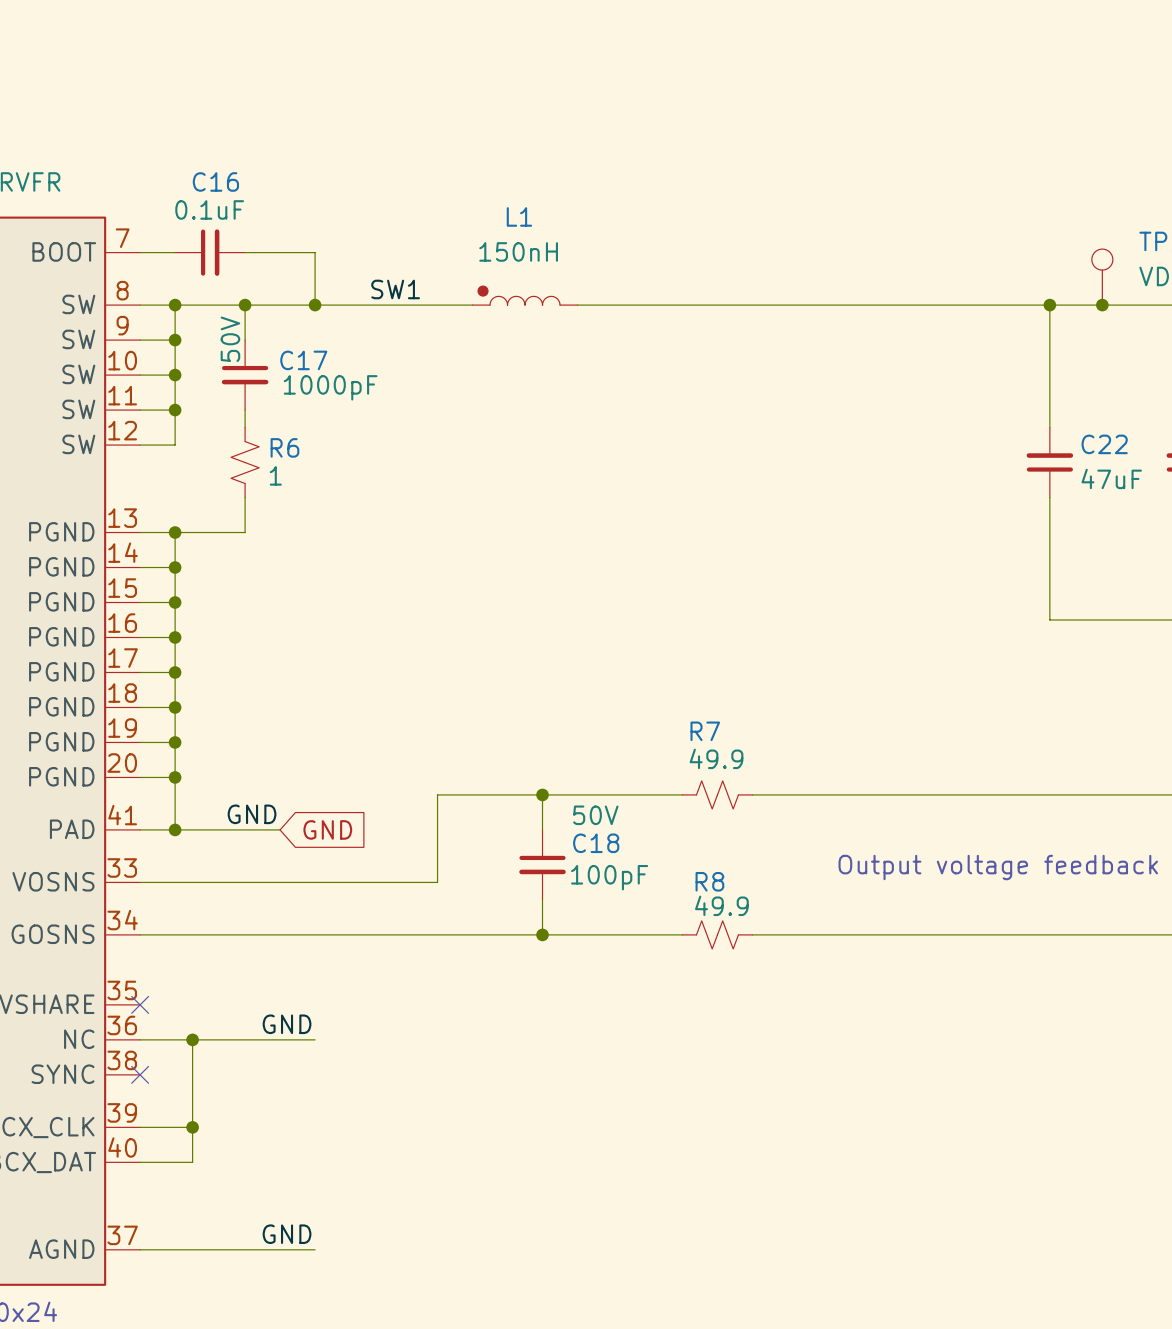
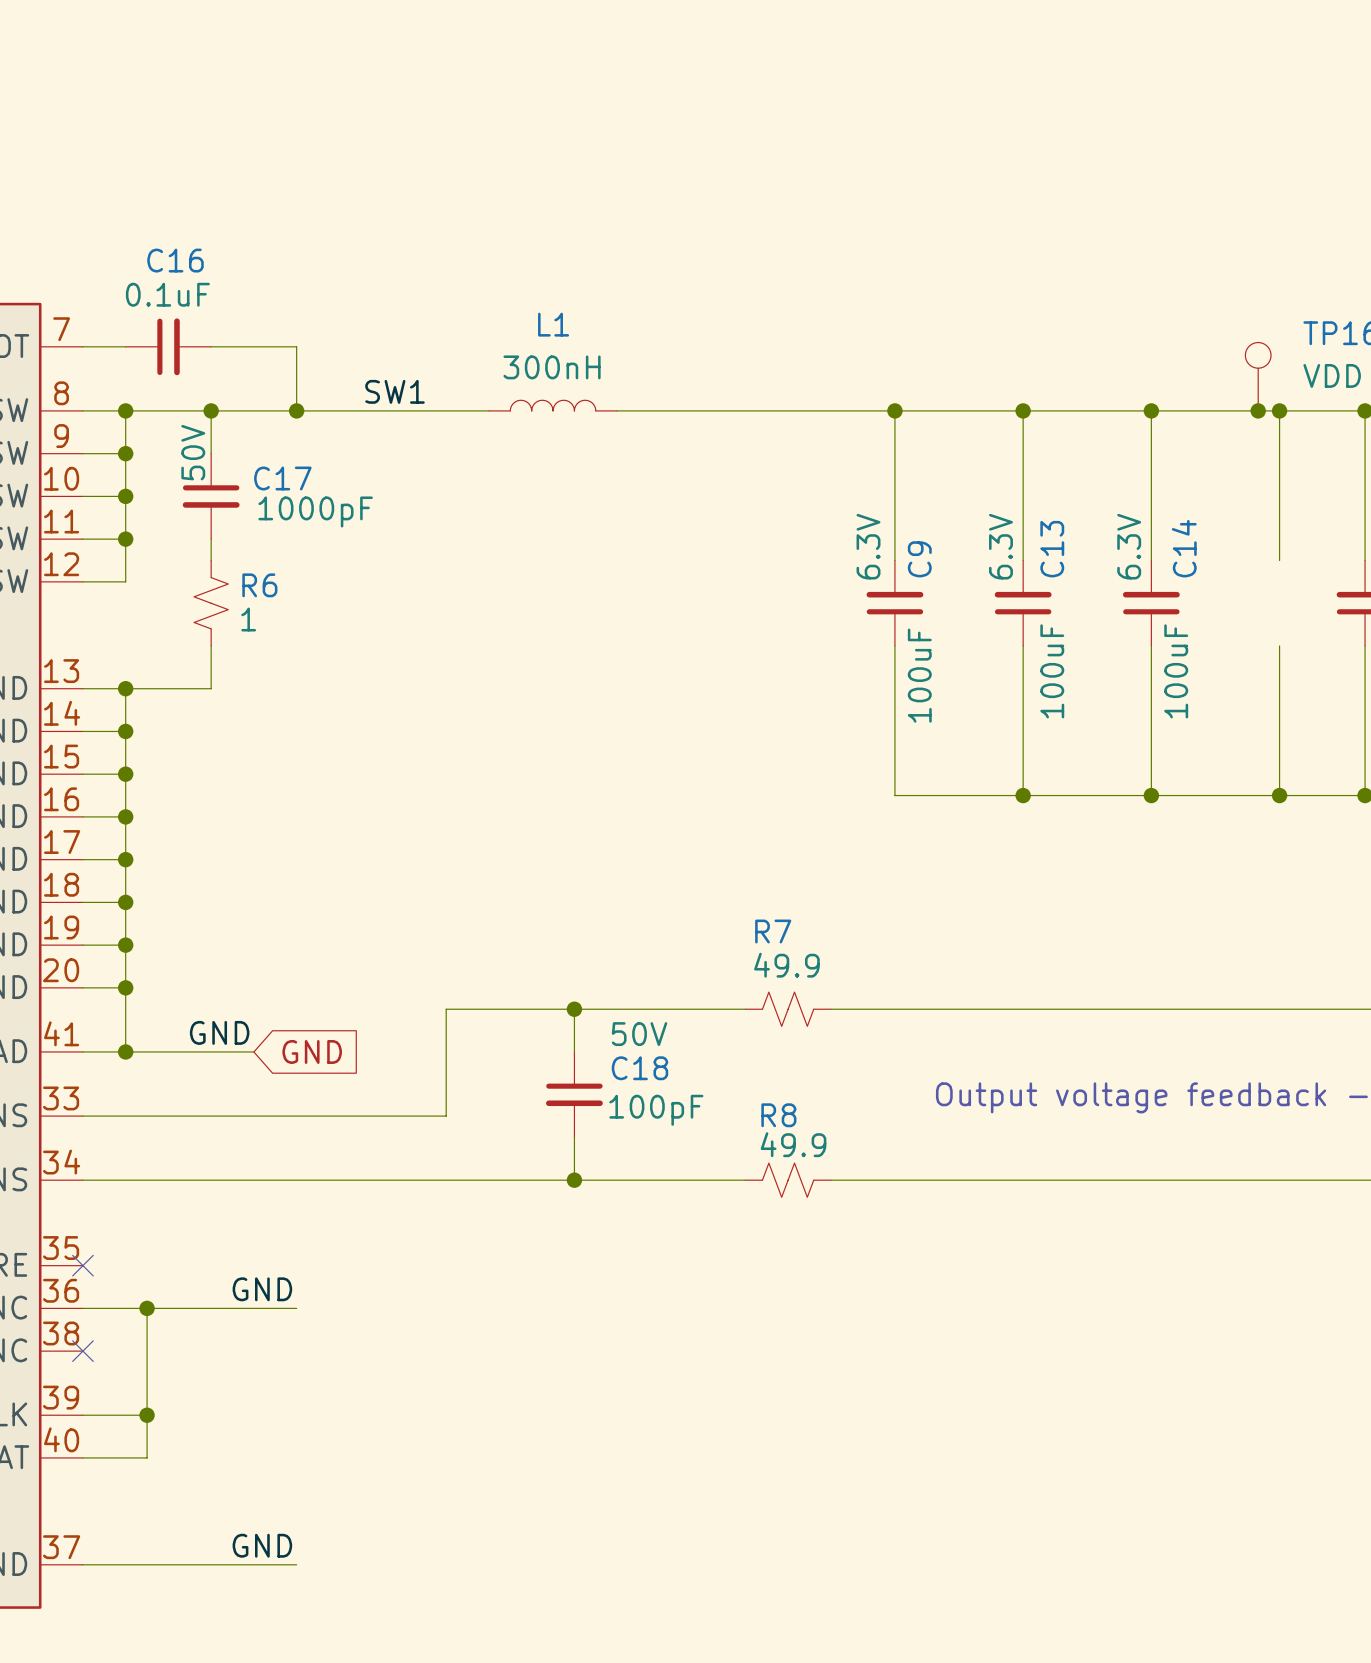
L1 value: 150nH (518, 251) -> 300nH (552, 367)
L1 symbol: [472, 286, 578, 306] -> [488, 400, 618, 411]
wire: none -> (894, 410) (894, 560)
junction: none -> (894, 410)
wire: none -> (1023, 410) (1023, 560)
junction: none -> (1023, 410)
junction: none -> (1151, 410)
wire: (1049, 305) (1049, 427) -> (1151, 410) (1151, 560)
junction: (1049, 305) -> none
wire: none -> (1279, 410) (1279, 560)
junction: none -> (1279, 410)
C9: none -> 100uF (894, 603)
C13: none -> 100uF (1023, 603)
C14: none -> 100uF (1151, 603)
C22: 47uF (1049, 462) -> none
wire: none -> (1023, 645) (1023, 795)
wire: none -> (1151, 645) (1151, 795)
wire: (1049, 497) (1049, 620) -> (894, 645) (894, 795) (1194, 795)
wire: none -> (1279, 645) (1279, 795)
junction: none -> (1023, 795)
junction: none -> (1151, 795)
junction: none -> (1279, 795)

